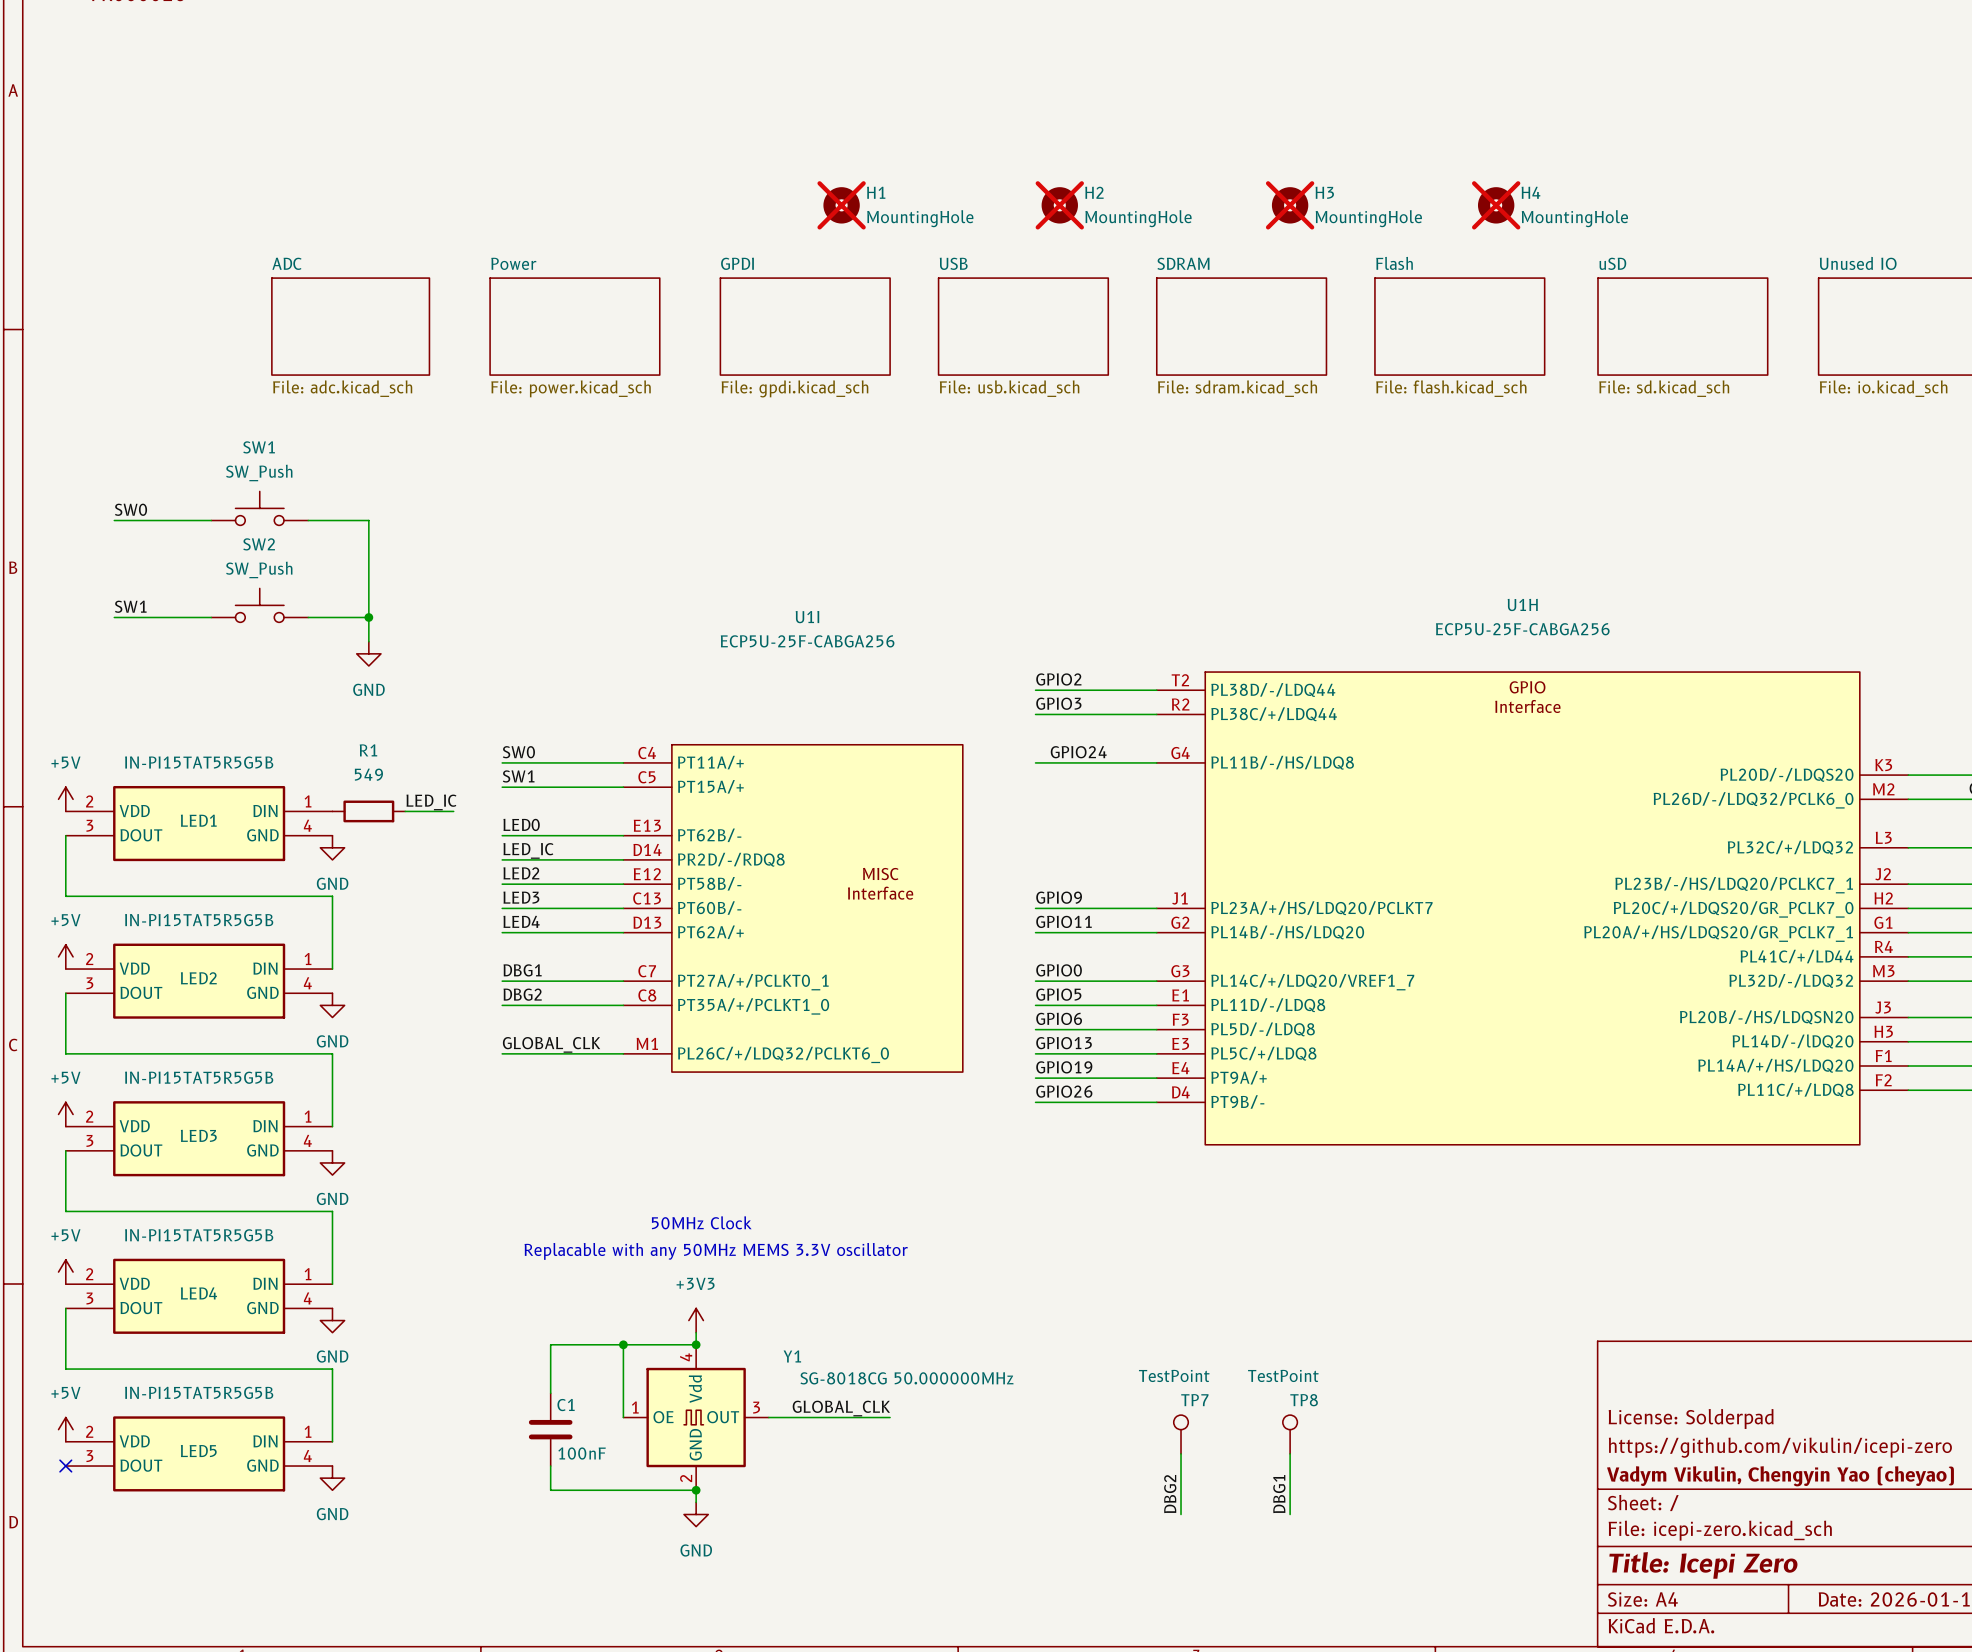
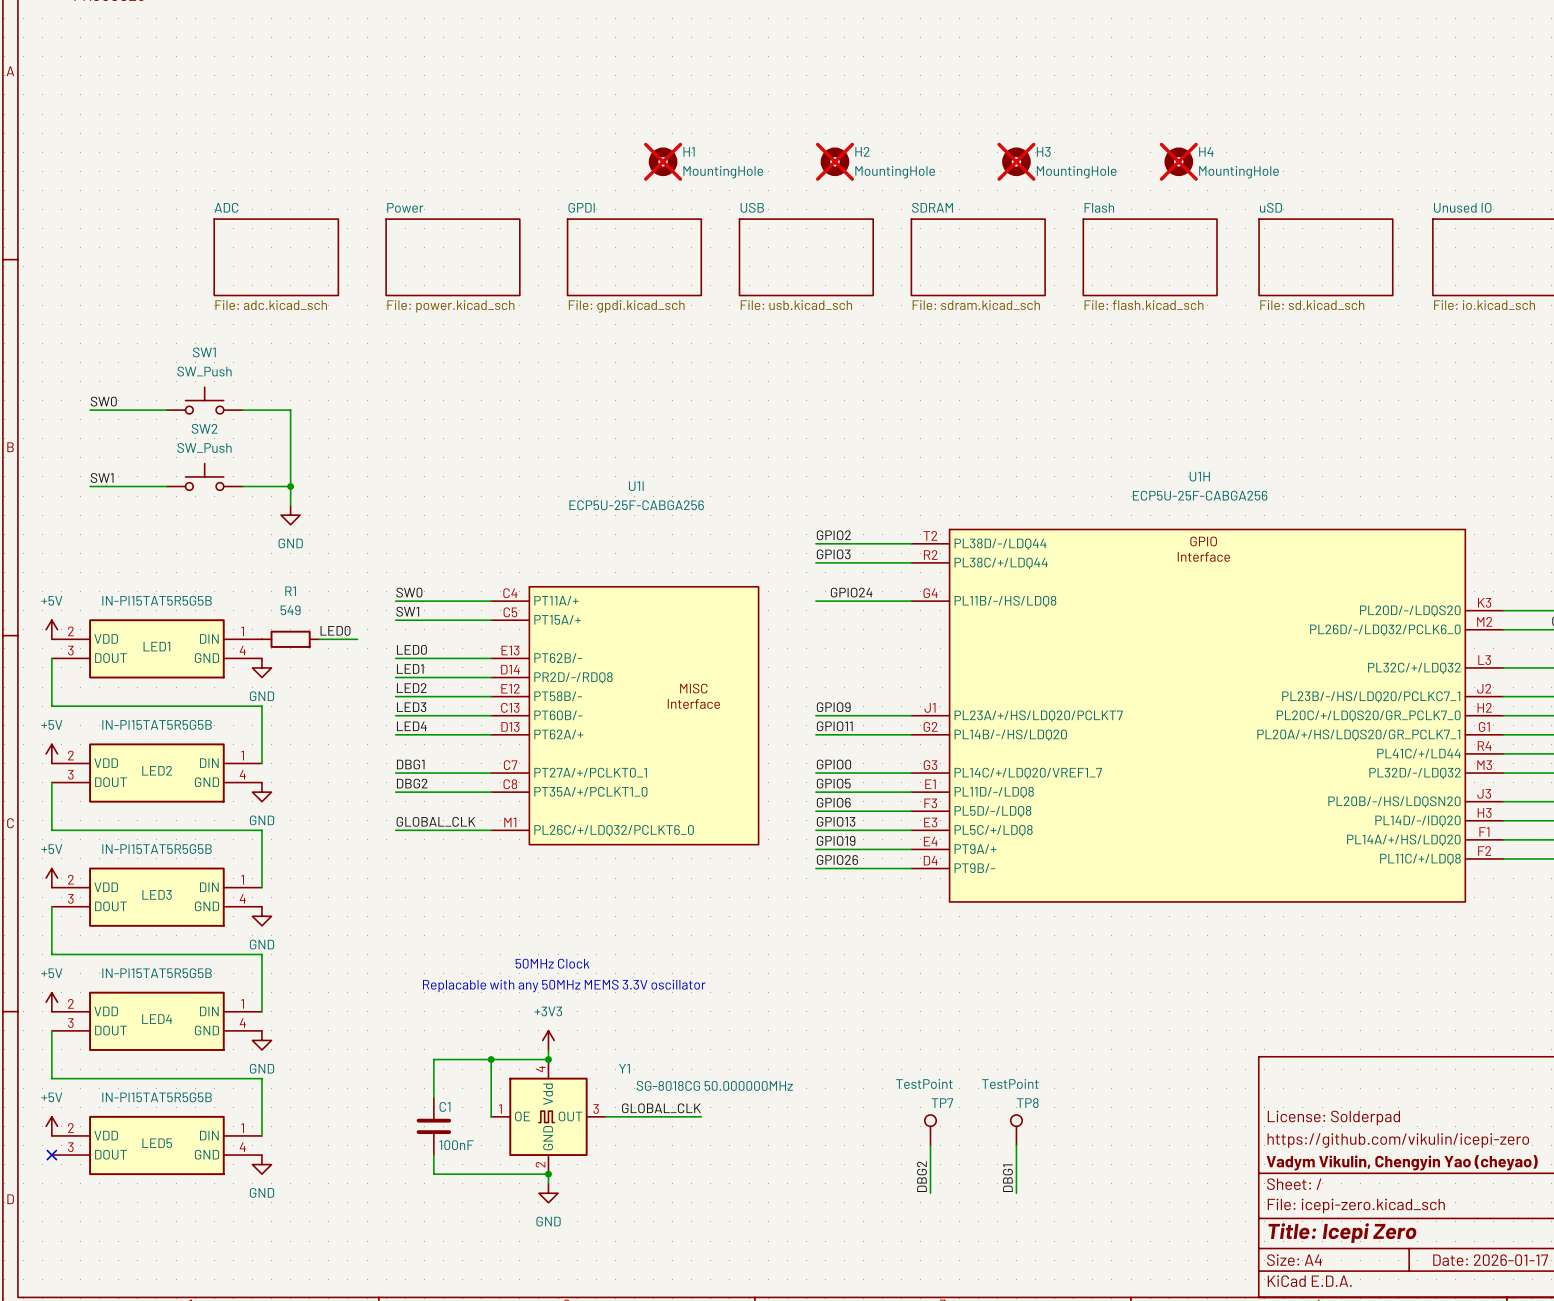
label: LED_IC (431, 802) -> LED0 (335, 630)
label: LED_IC (528, 850) -> LED1 (410, 668)

